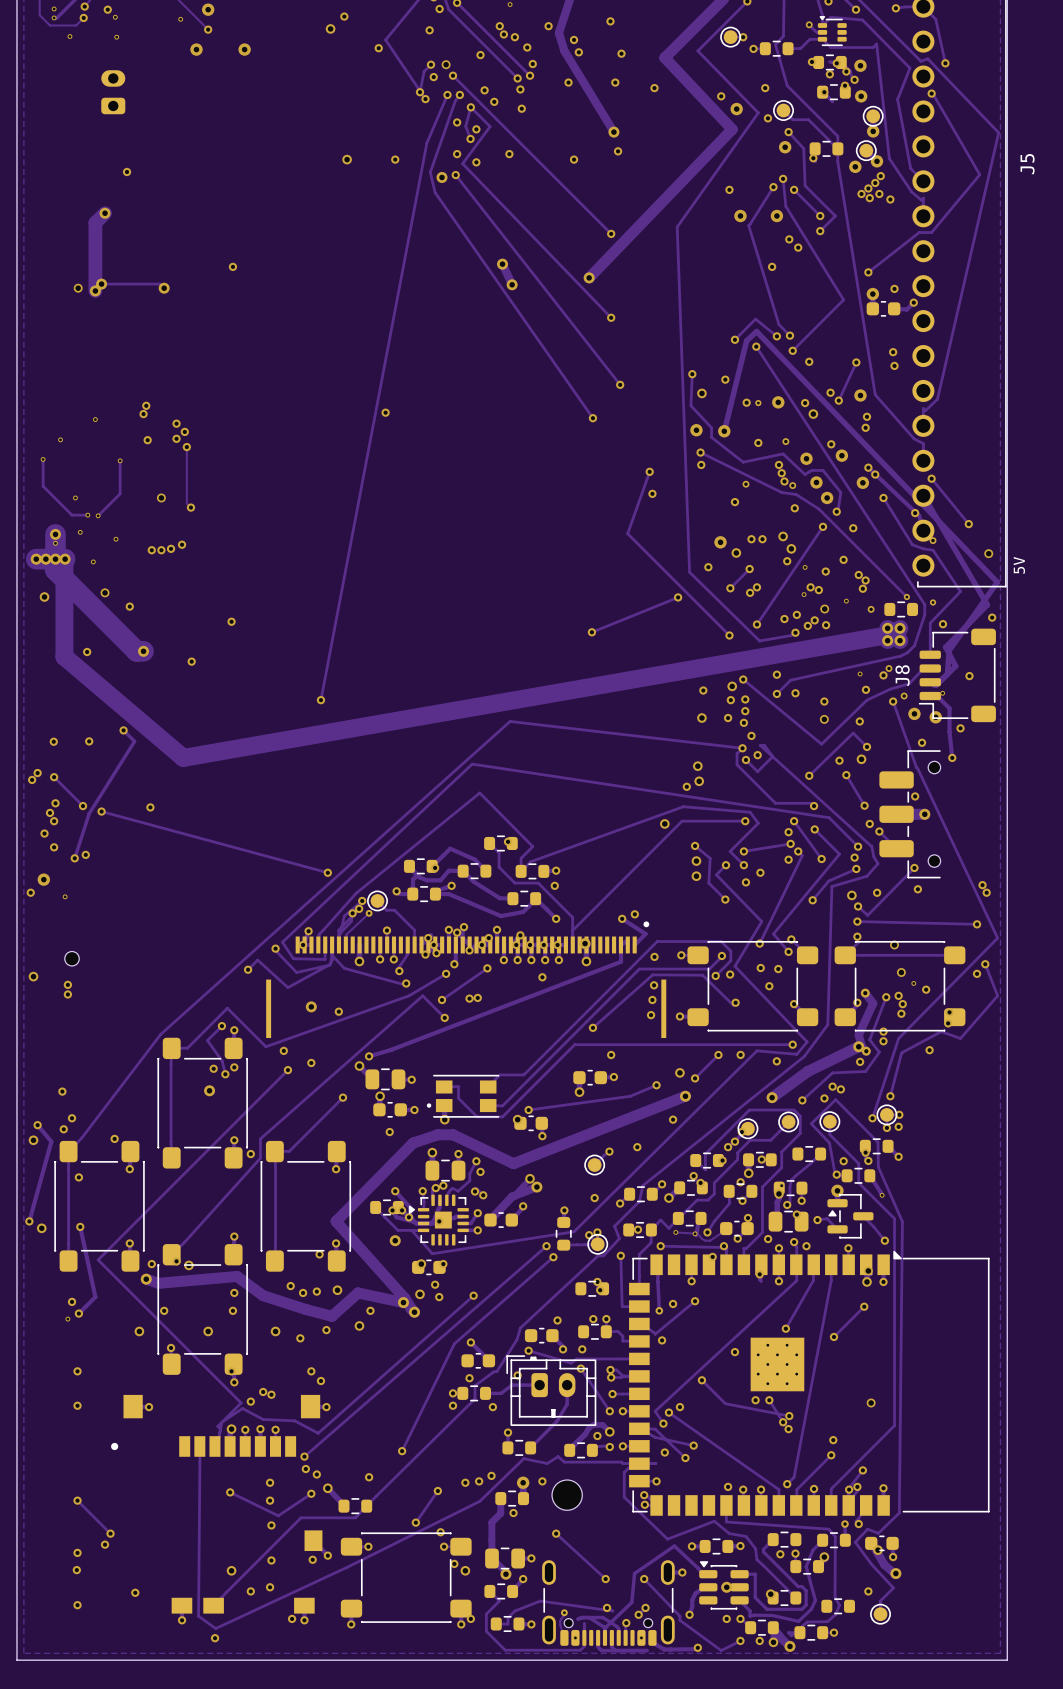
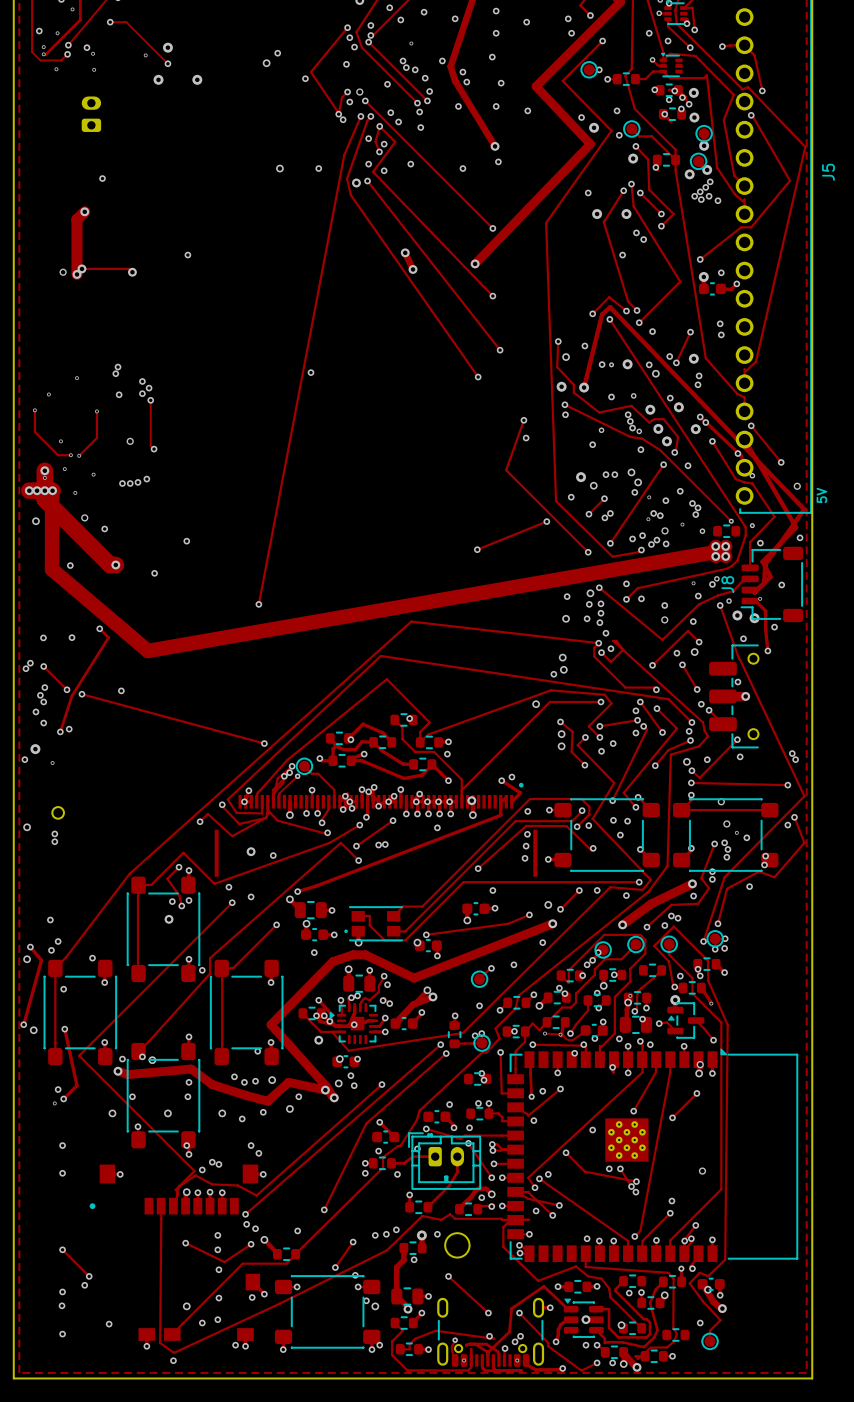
track: (865, 993) (873, 1003) (858, 1035) (861, 1046) (866, 1051) -> none
via: (865, 993) -> none
via: (866, 1051) -> none

